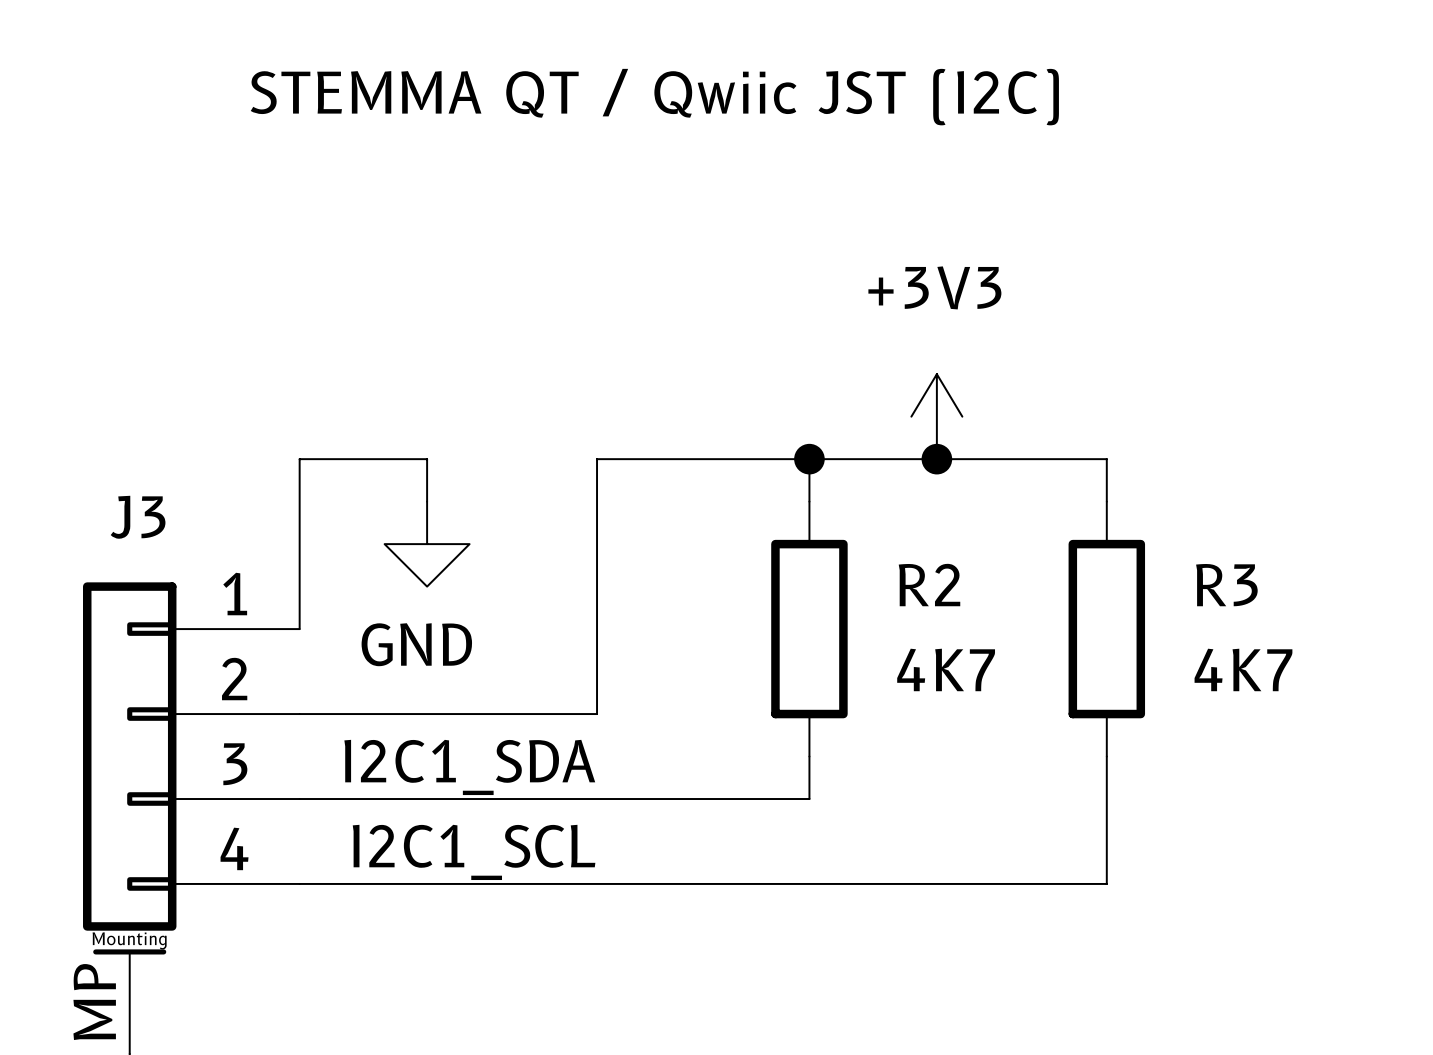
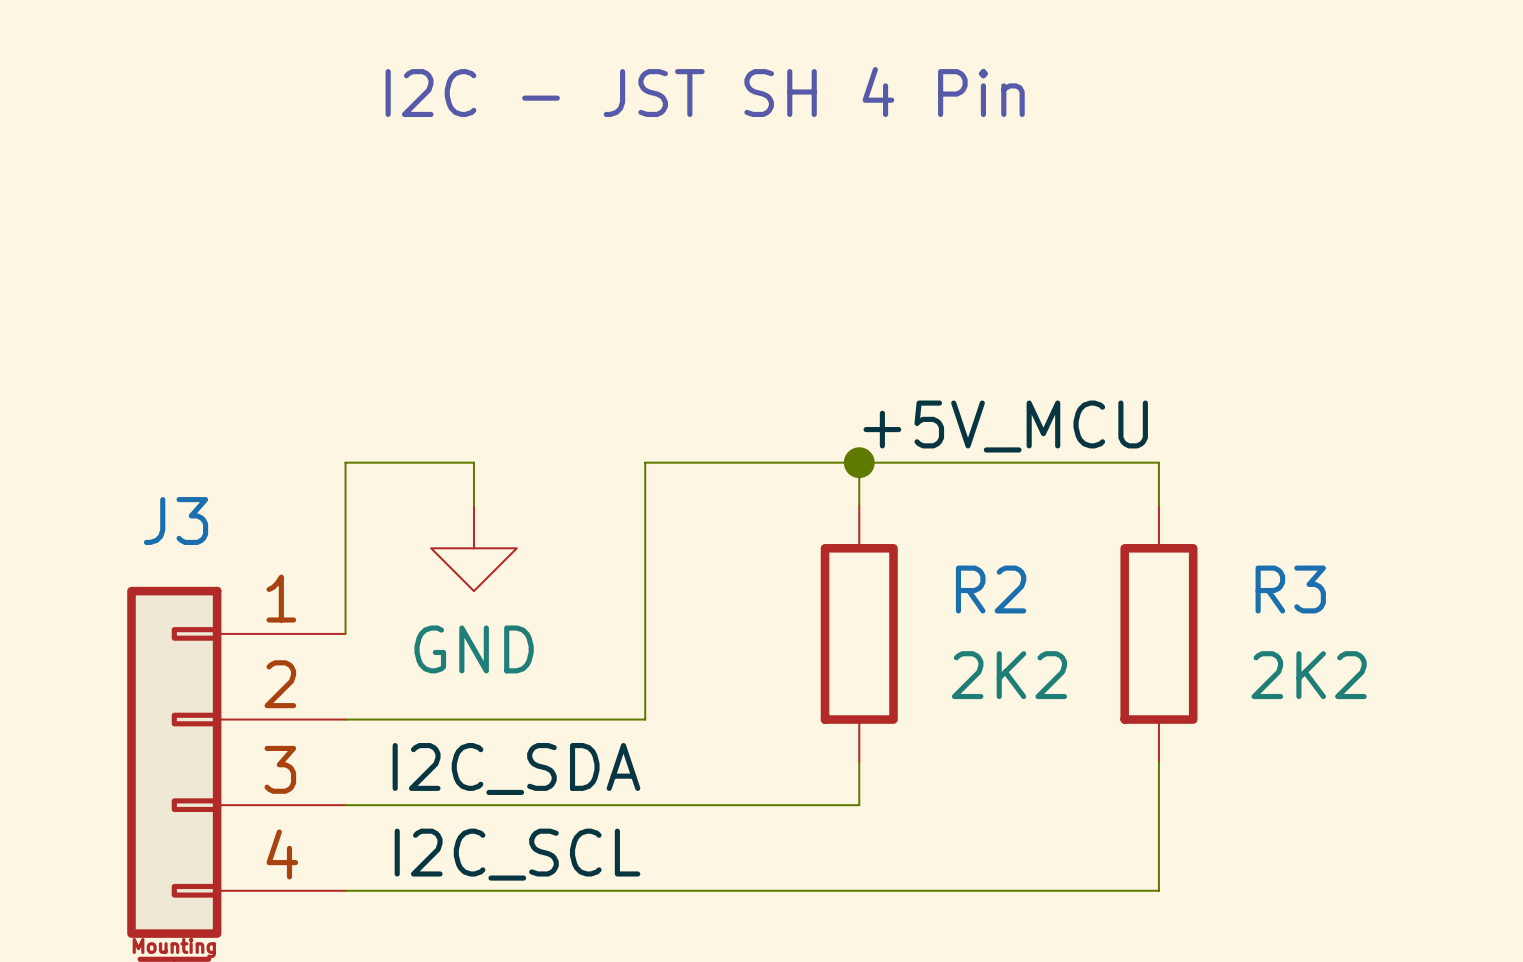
text: STEMMA QT / Qwiic JST (I2C) (654, 97) -> I2C - JST SH 4 Pin (705, 92)
power symbol: +3V3 (936, 416) -> none
label: none -> +5V_MCU (1005, 426)
junction: (936, 459) -> none
R2 value: 4K7 (946, 669) -> 2K2 (1009, 675)
R3 value: 4K7 (1243, 669) -> 2K2 (1309, 675)
label: I2C1_SDA (469, 767) -> I2C_SDA (516, 768)
label: I2C1_SCL (474, 852) -> I2C_SCL (517, 854)

